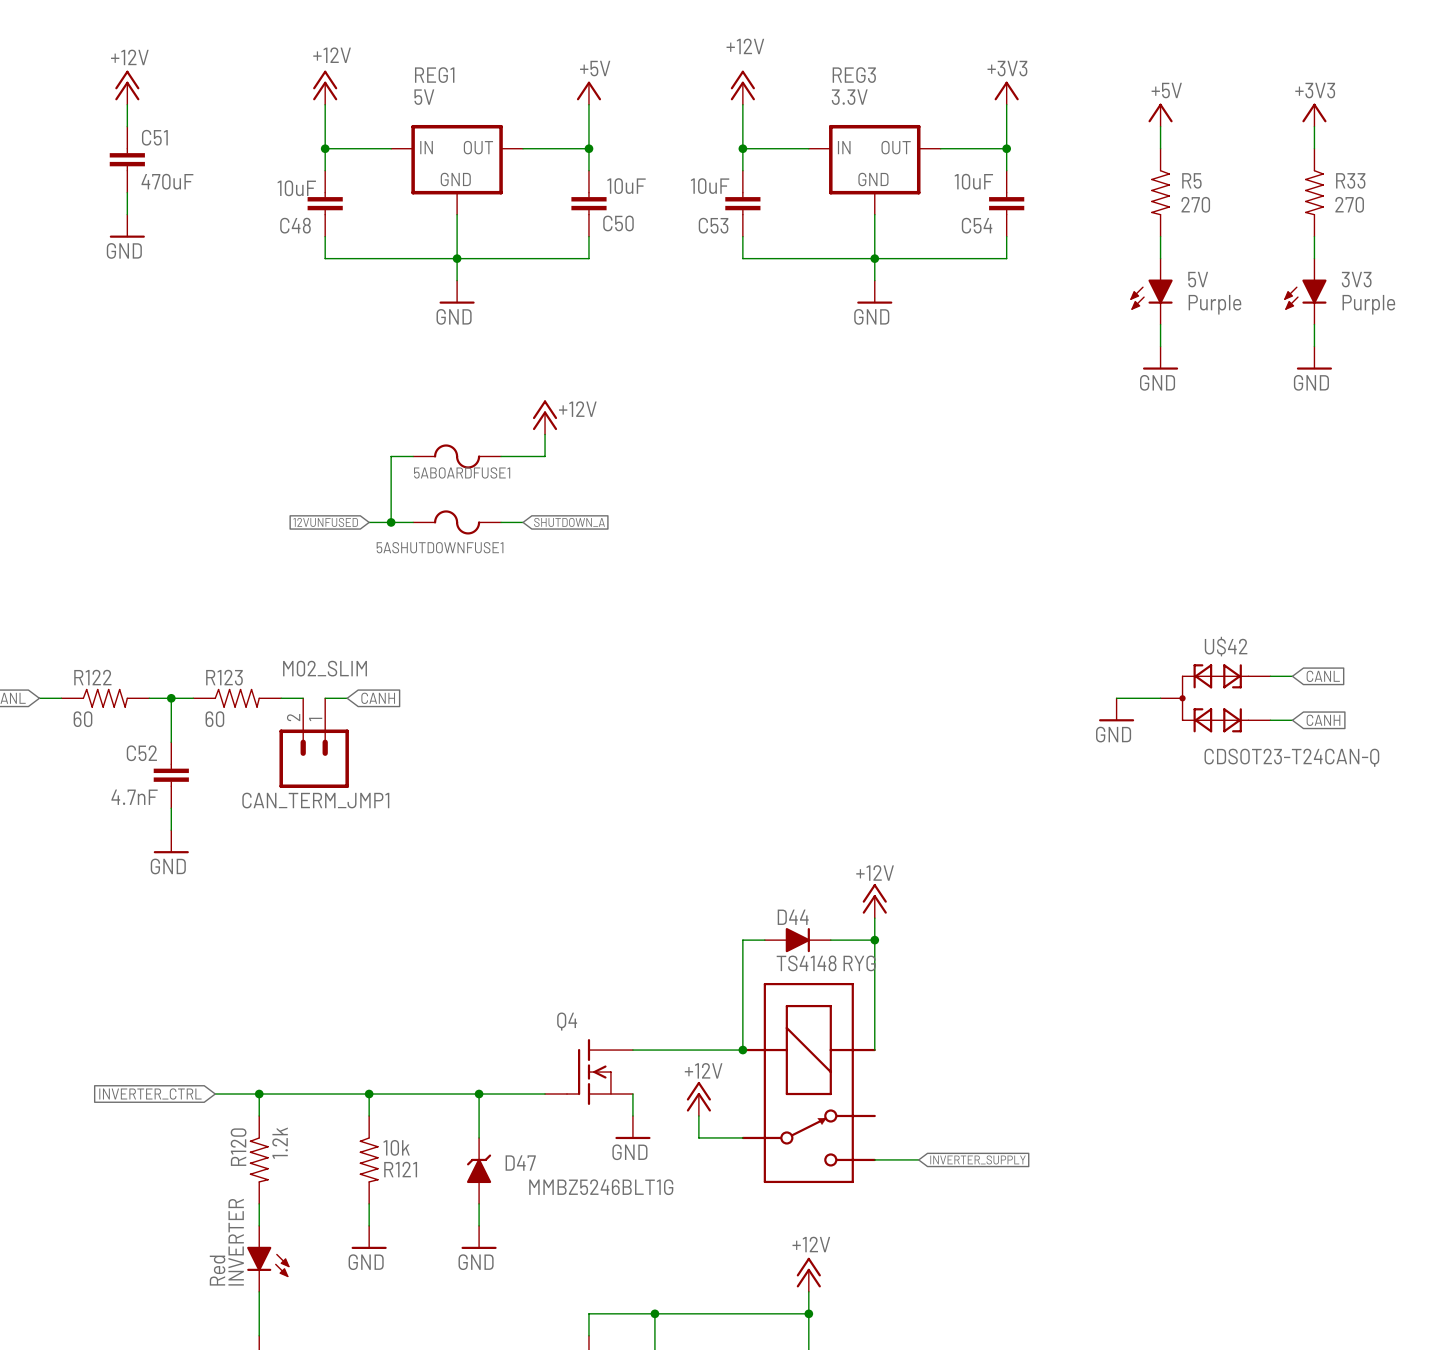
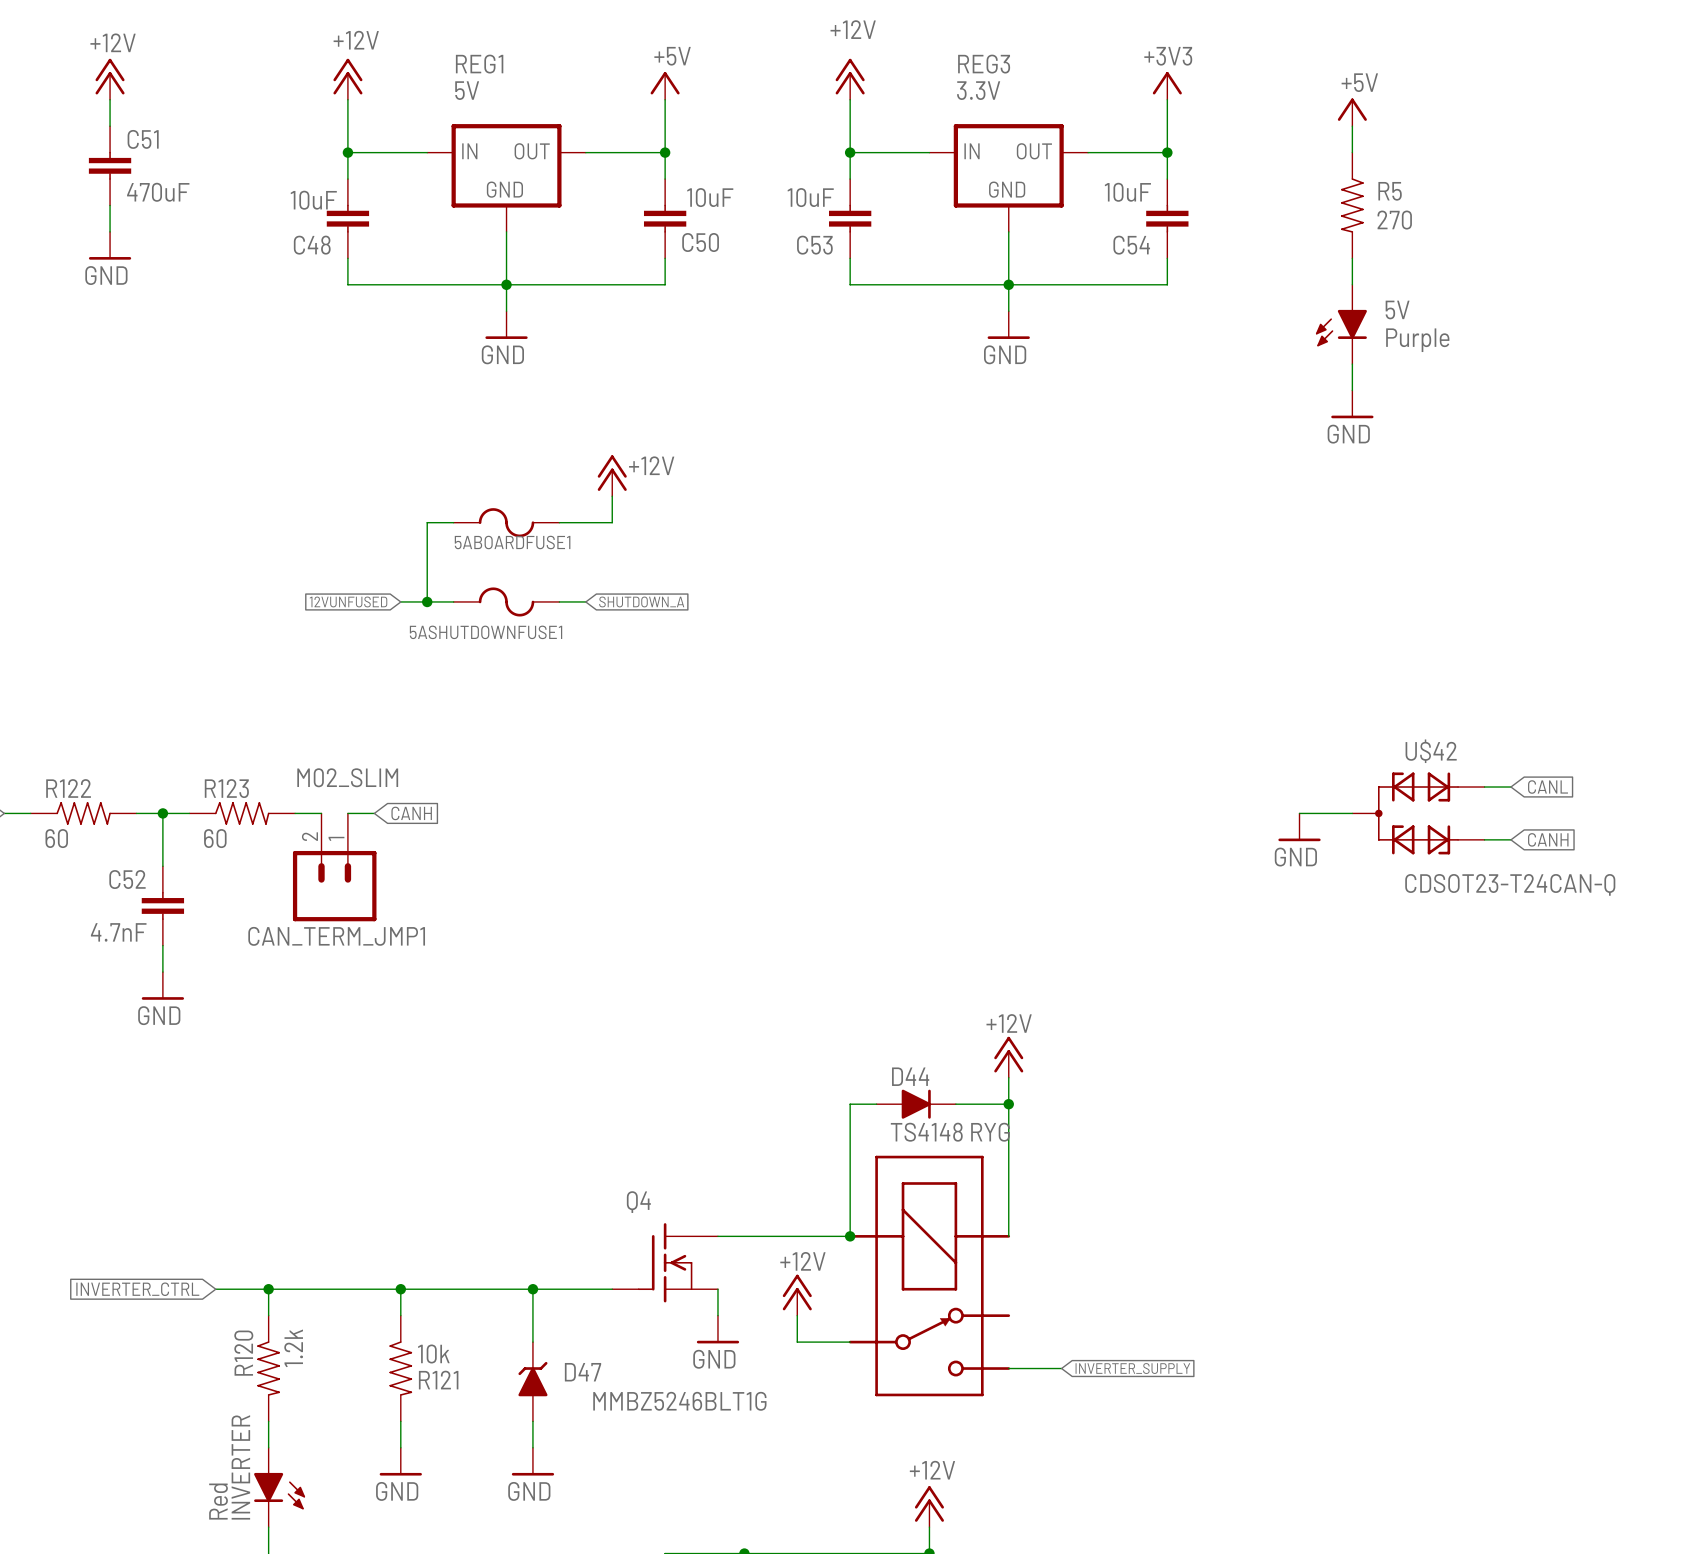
power symbol: +3V3 (1314, 115) -> none
wire: (1314, 126) (1314, 148) -> none
R33: 270 (1314, 192) -> none
wire: (1314, 236) (1314, 258) -> none
3V3: Purple (1305, 291) -> none
wire: (1314, 324) (1314, 346) -> none
power symbol: GND (1314, 358) -> none

